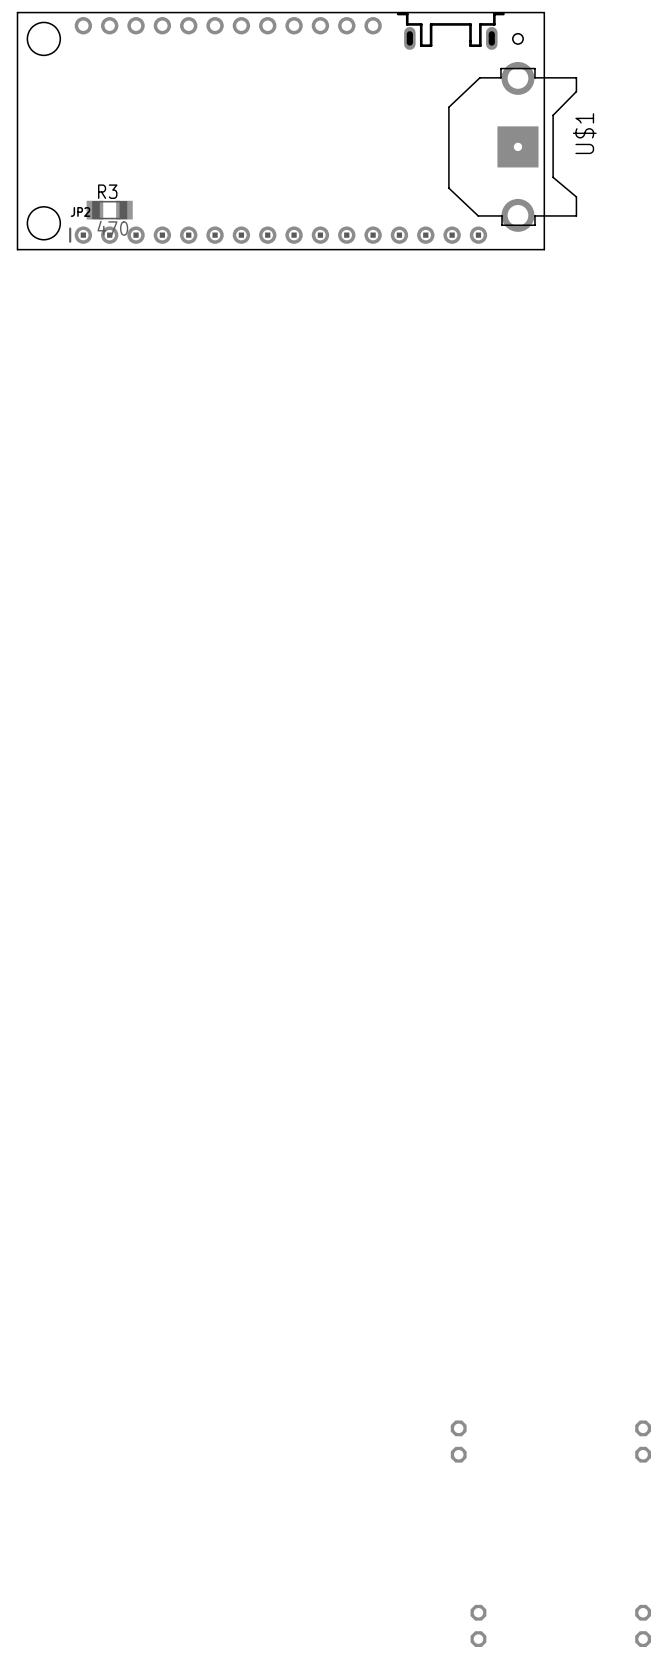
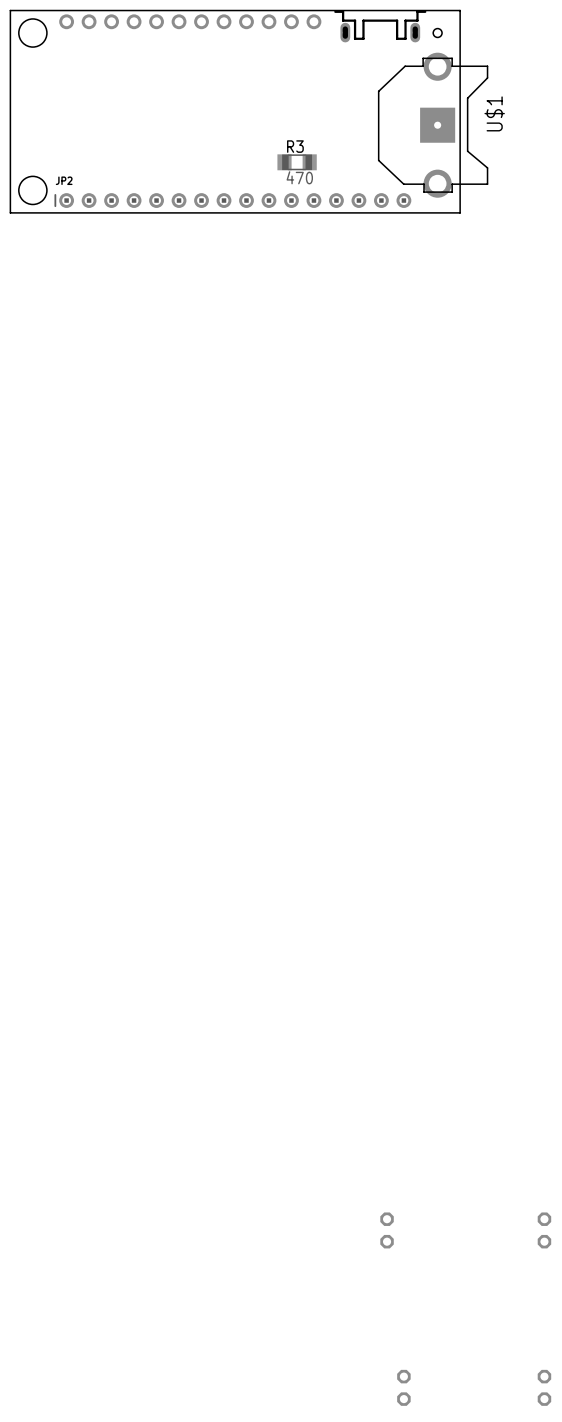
R3 position: (109, 210) -> (297, 162)

